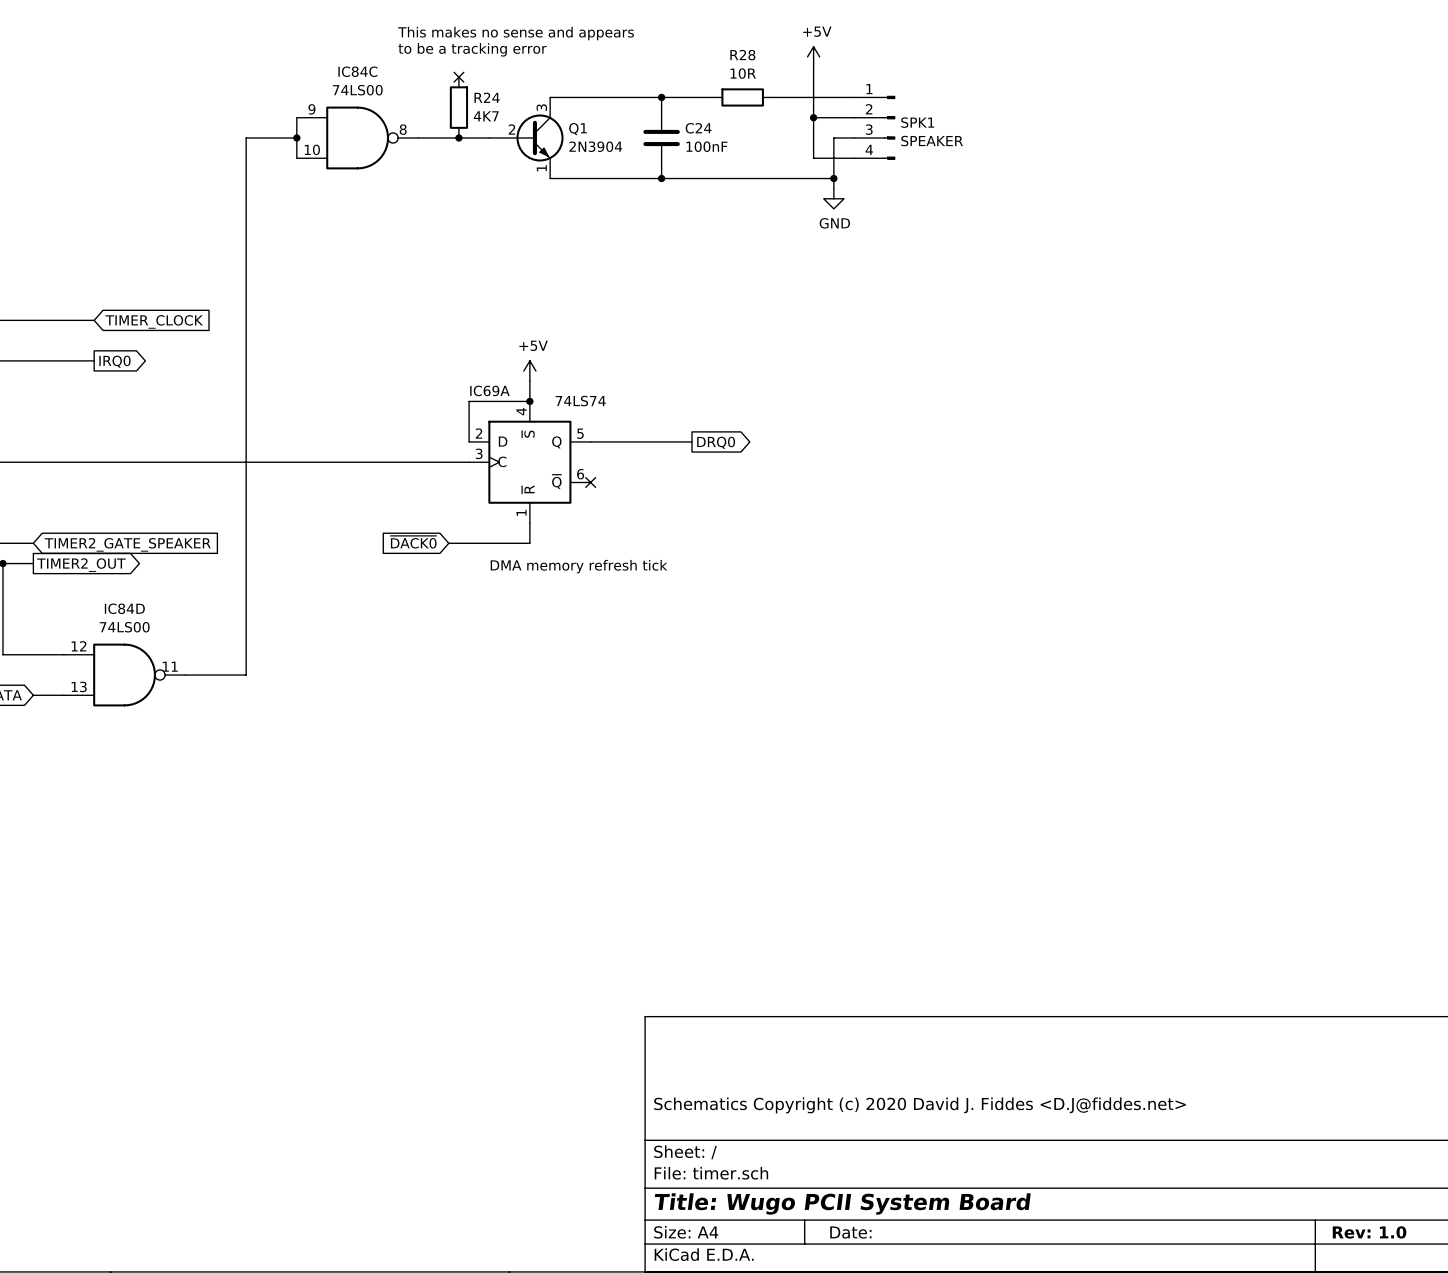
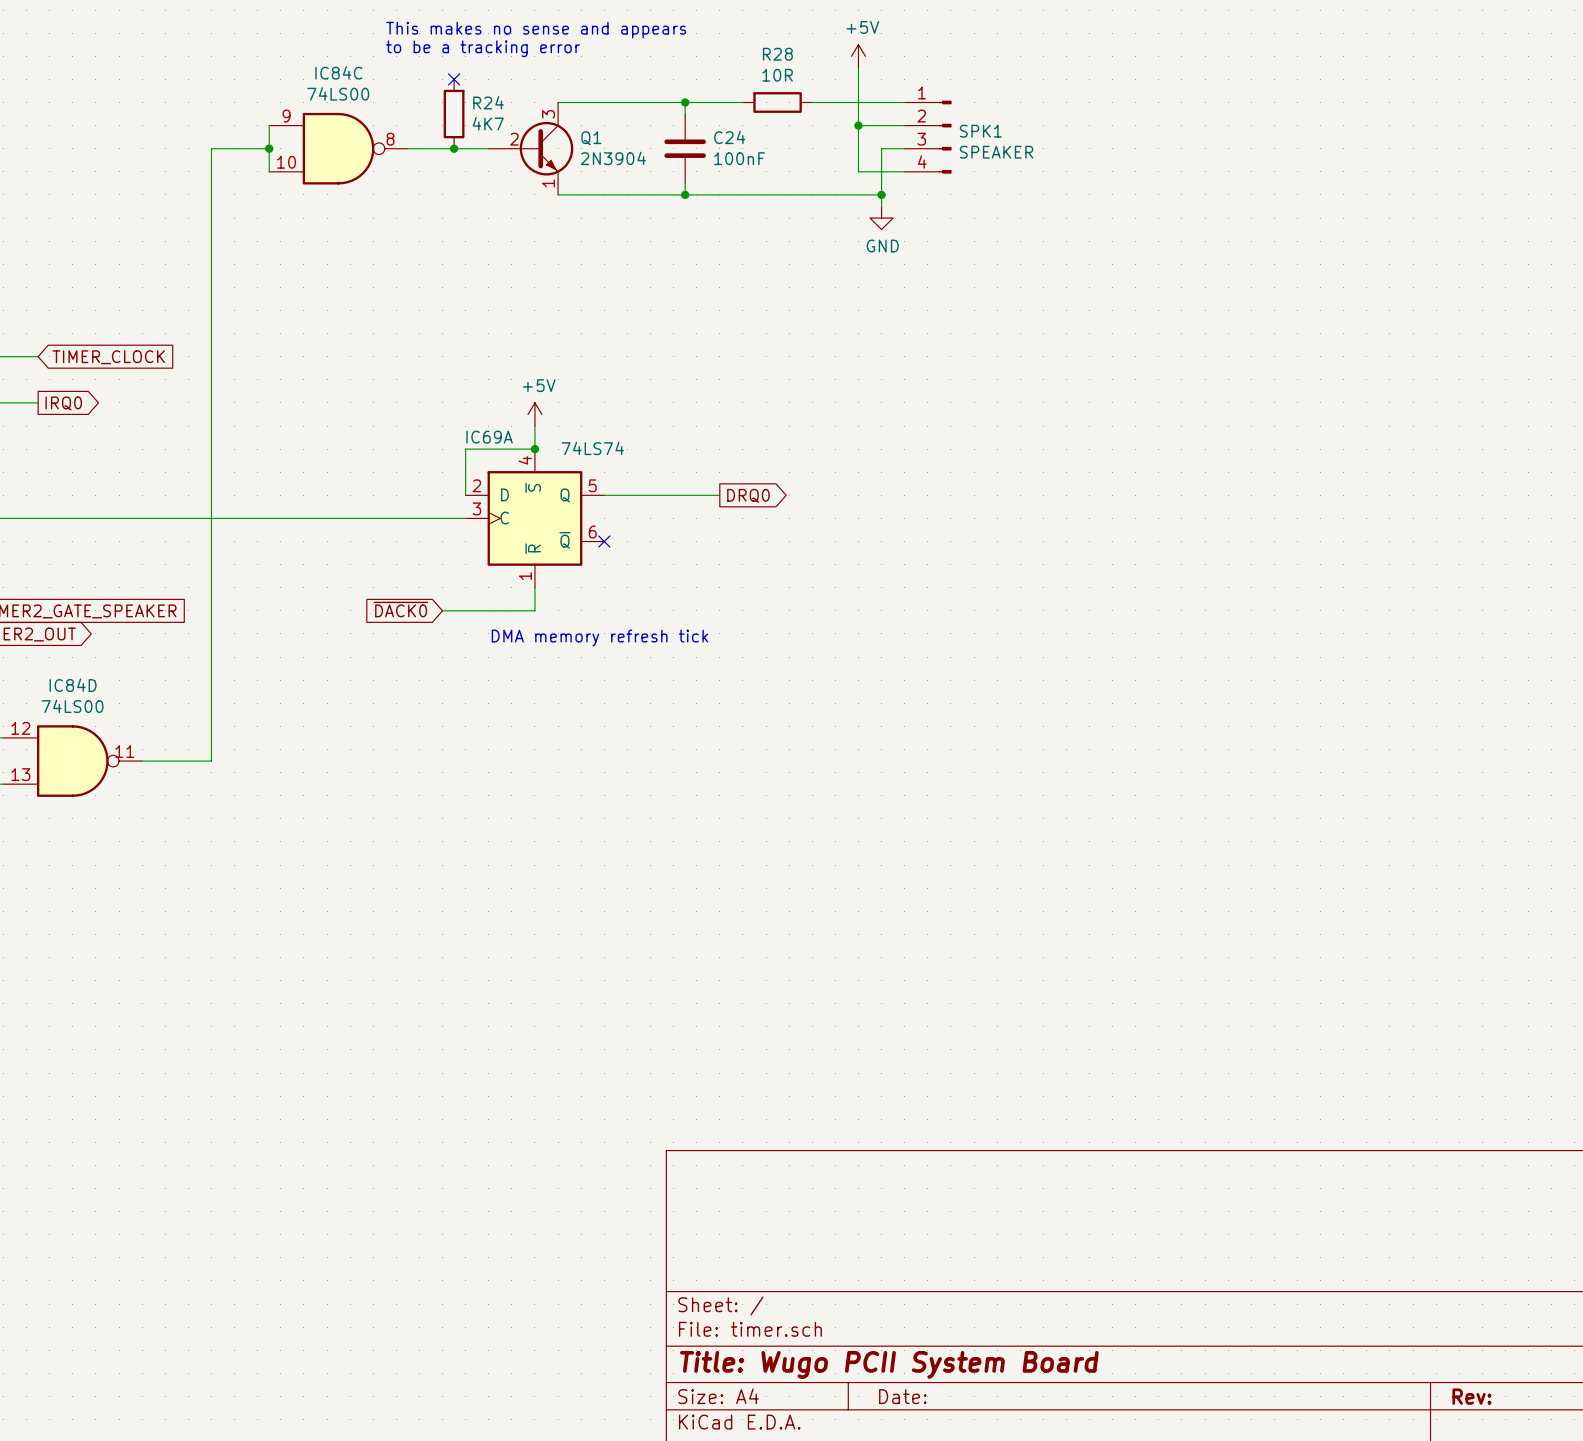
title block: Schematics Copyright (c) 2020 David J. Fiddes <D.J@fiddes.net> (920, 1105) -> none
title block: Rev: 1.0 (1369, 1232) -> Rev: (1471, 1396)

